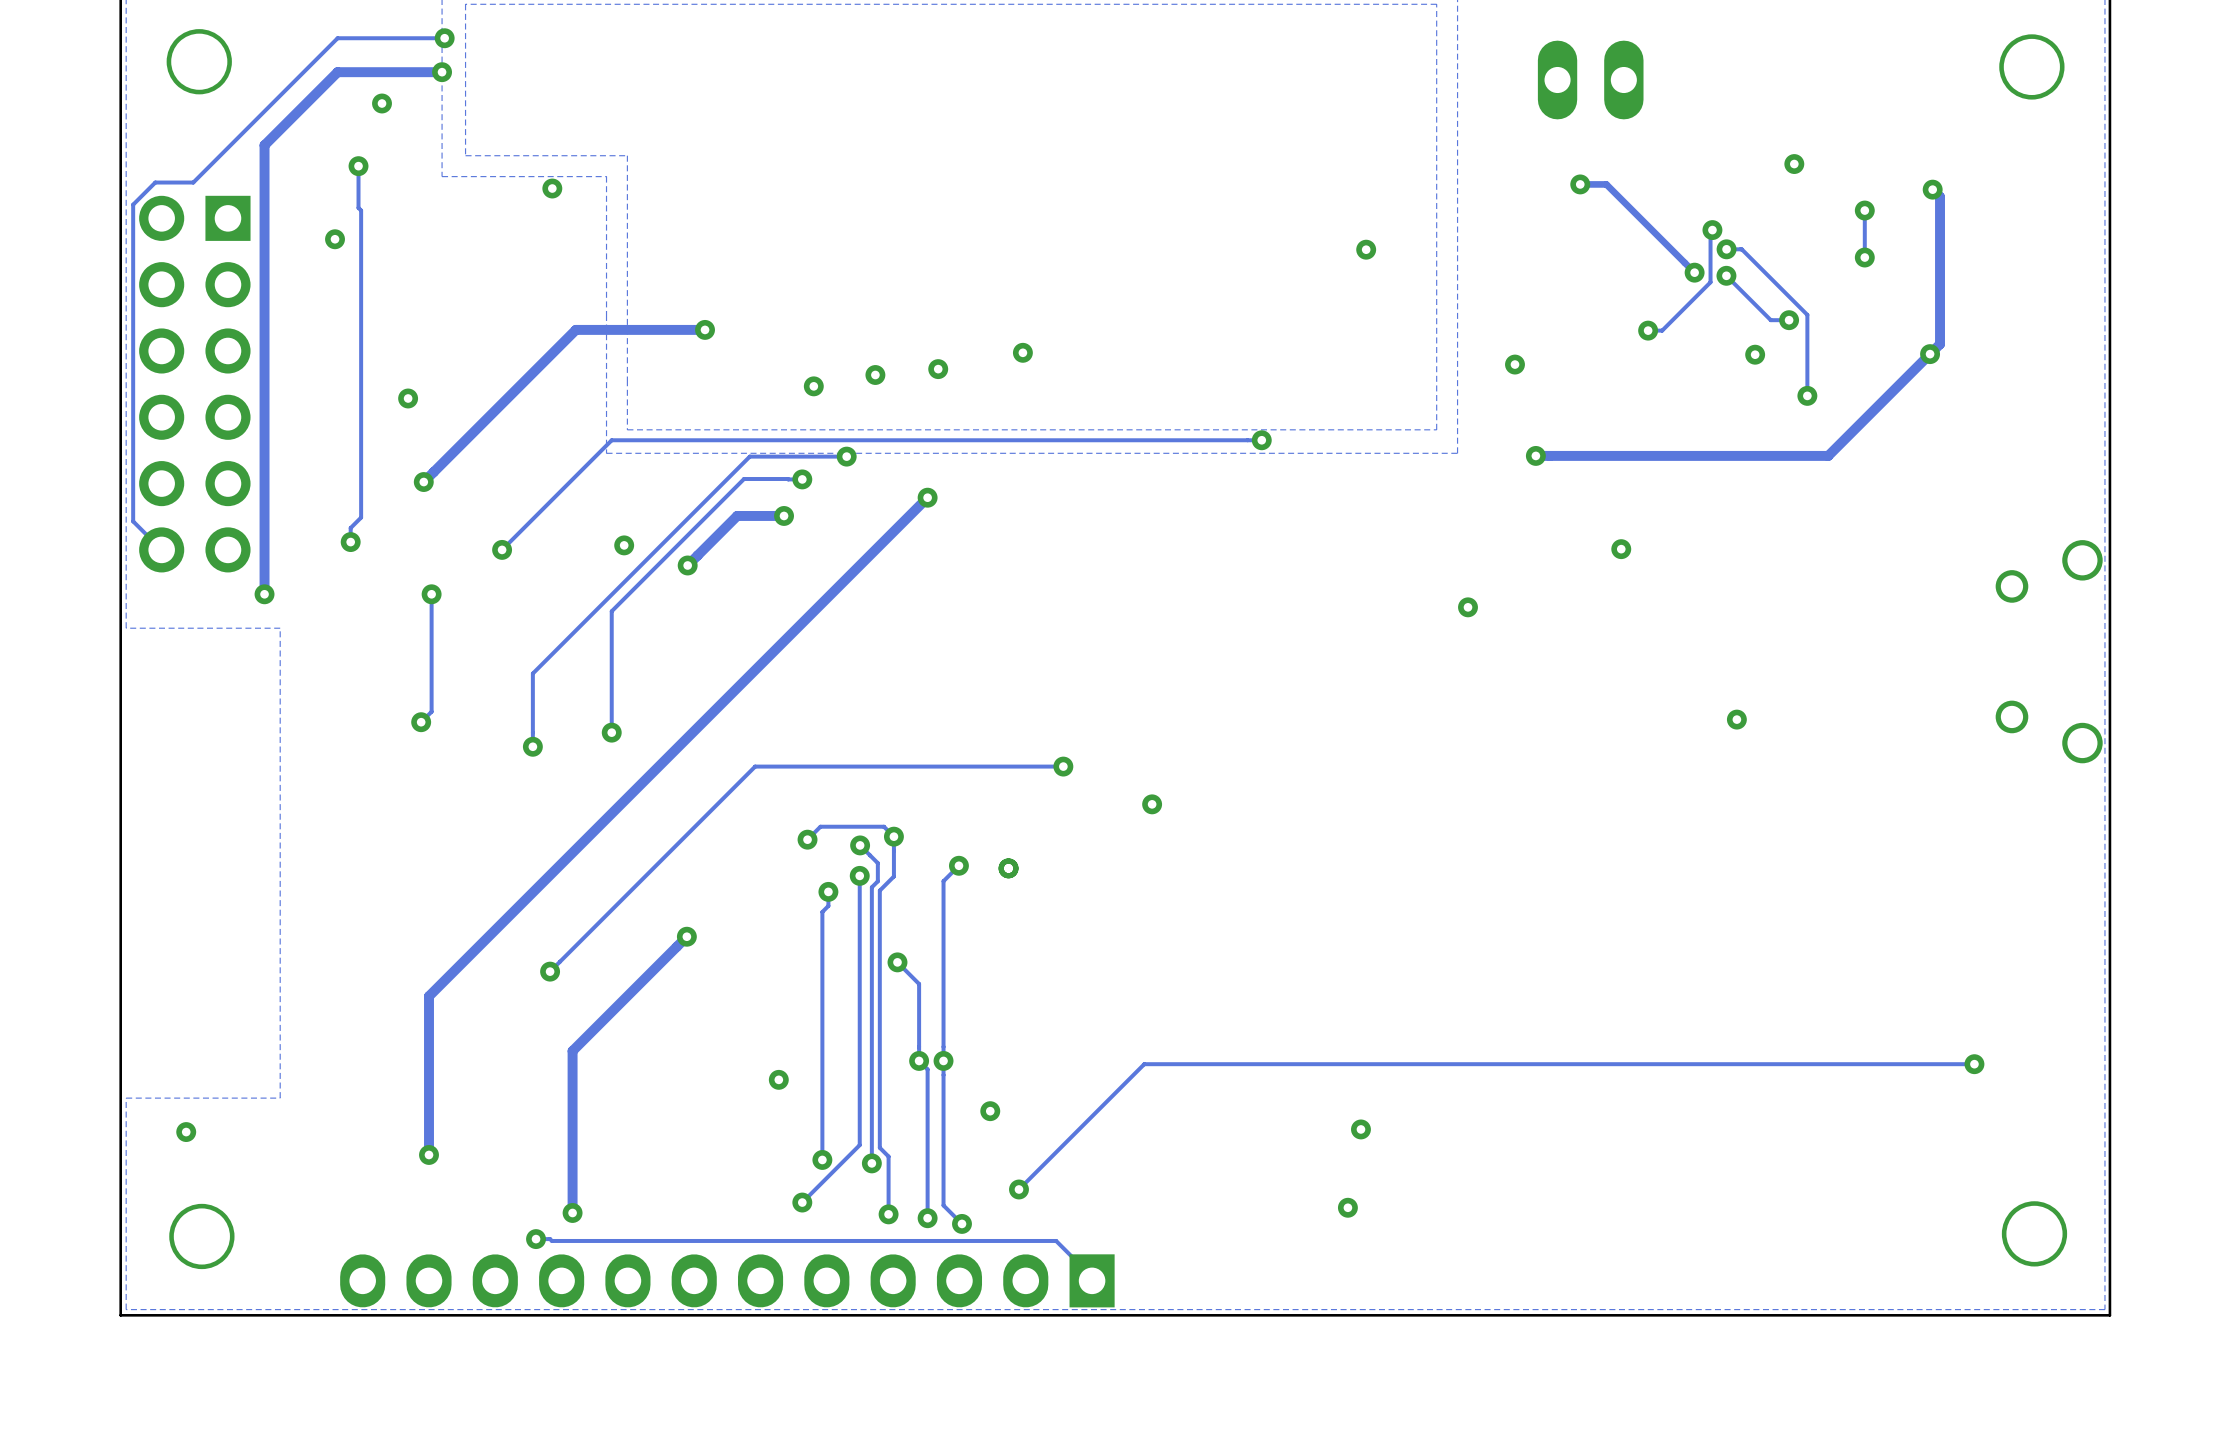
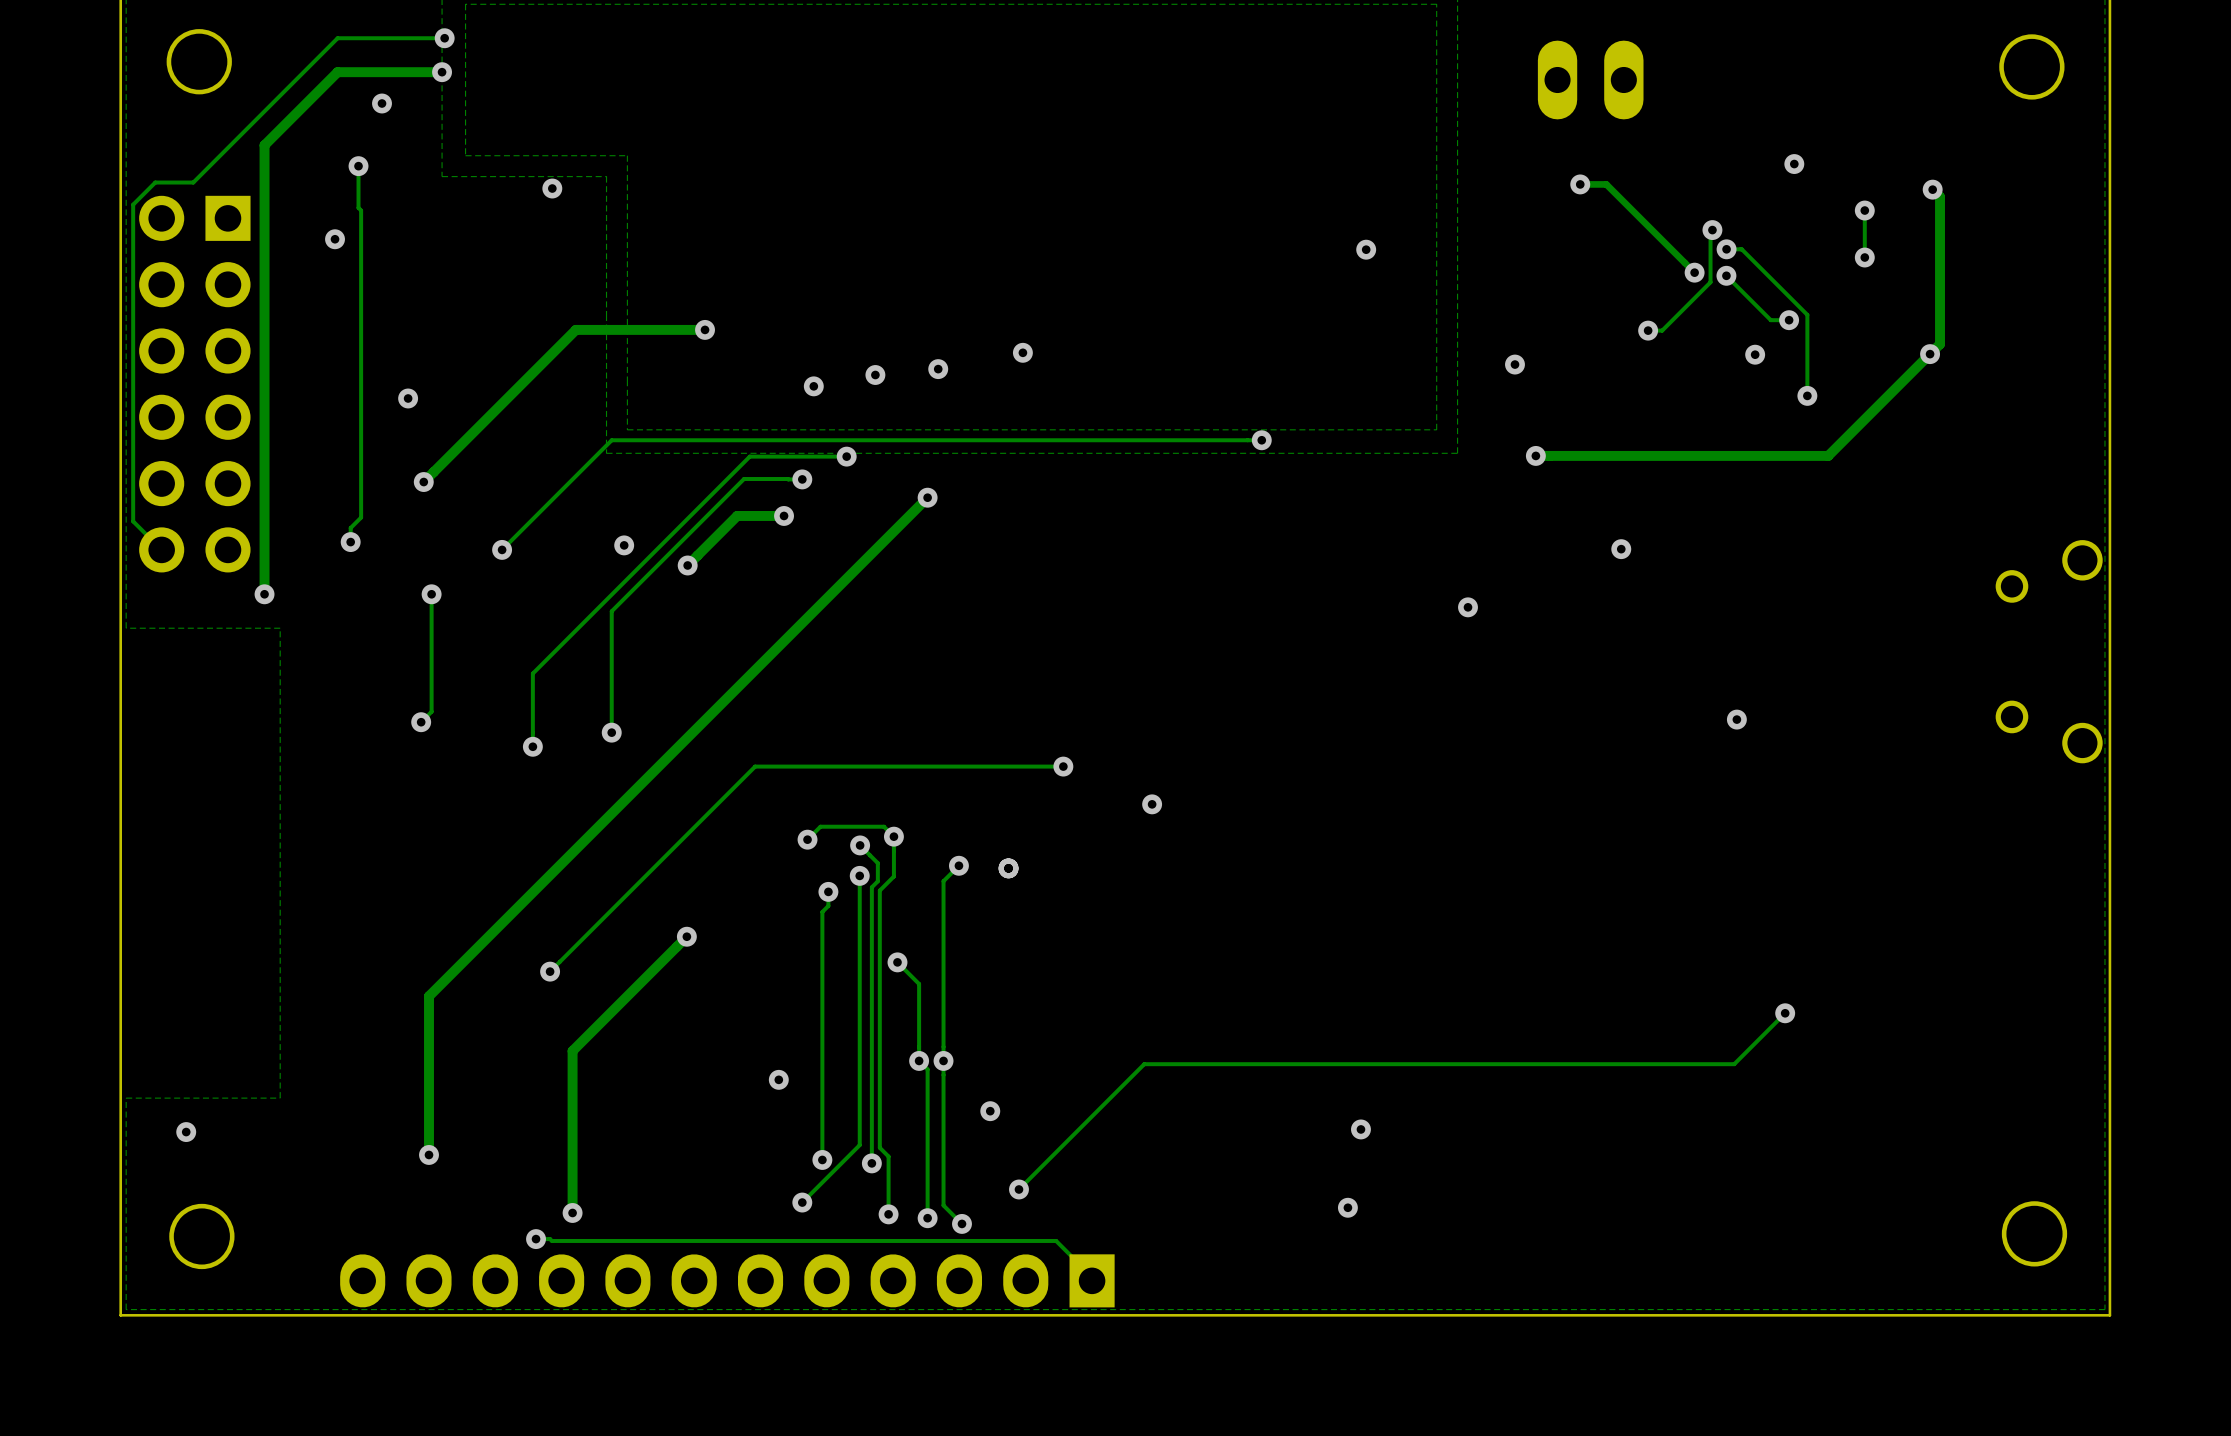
via: none -> (1785, 1013)
track: (1974, 1064) (1734, 1064) -> (1785, 1013) (1734, 1064)
via: (1974, 1064) -> none

